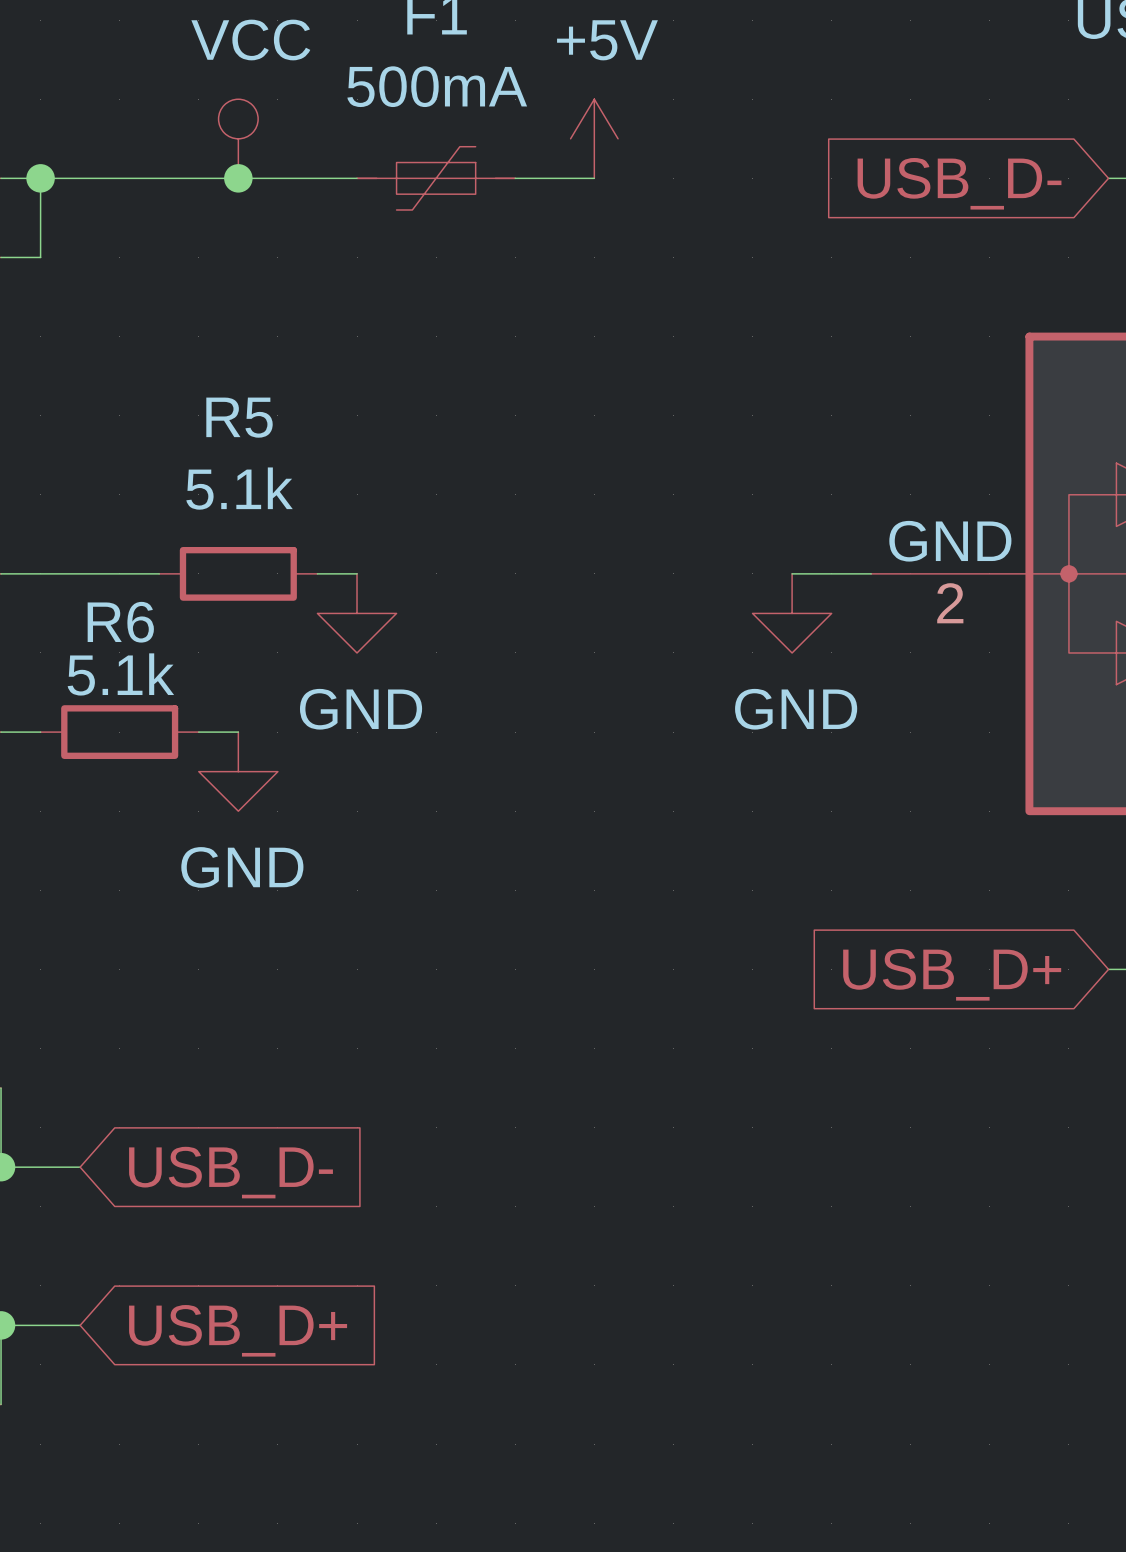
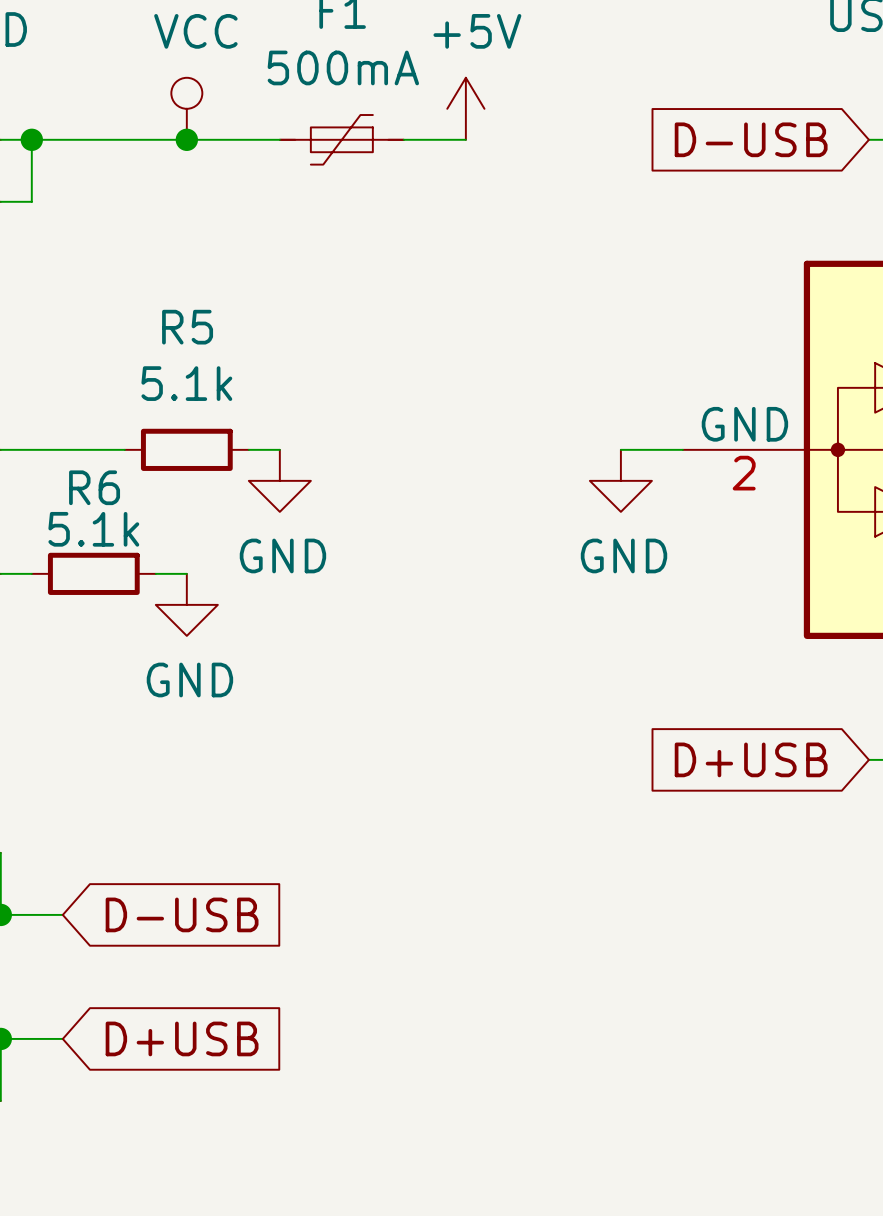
global label: USB_D- (959, 183) -> D-USB (751, 139)
global label: USB_D+ (952, 974) -> D+USB (751, 759)
global label: USB_D- (231, 1172) -> D-USB (182, 914)
global label: USB_D+ (238, 1330) -> D+USB (182, 1038)

